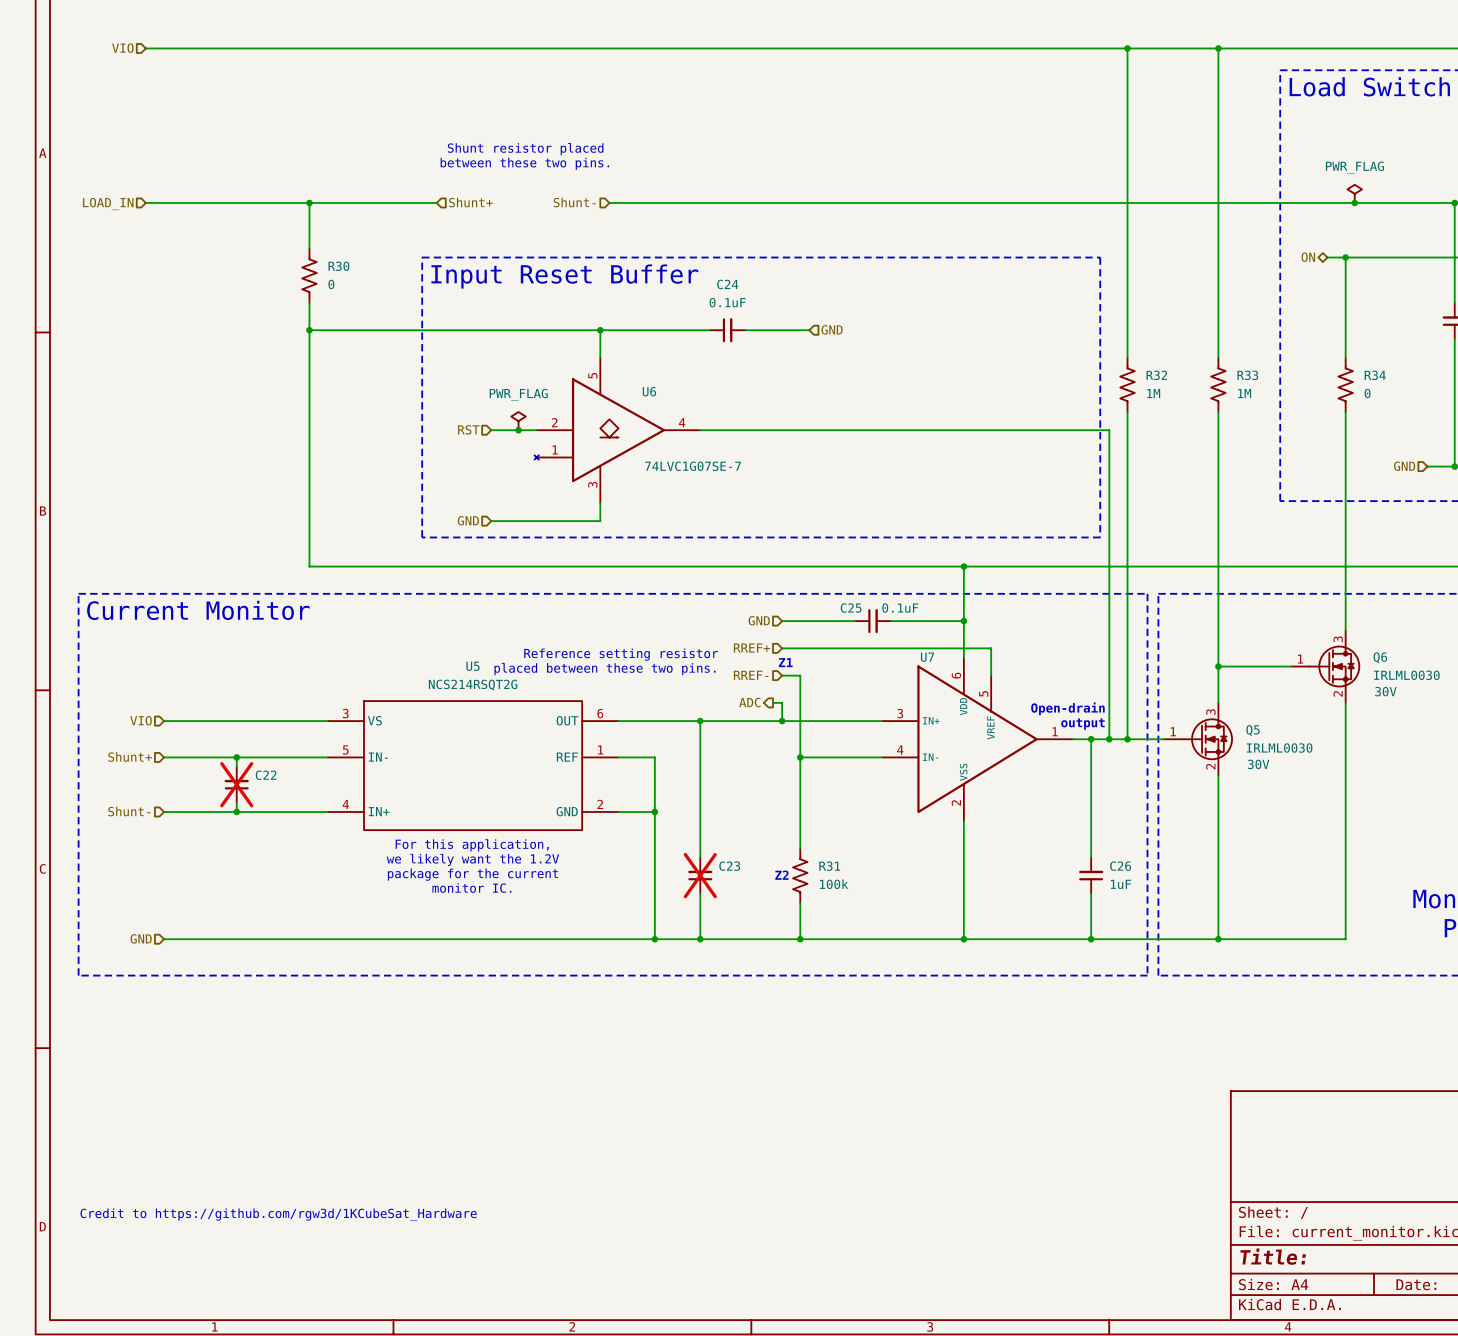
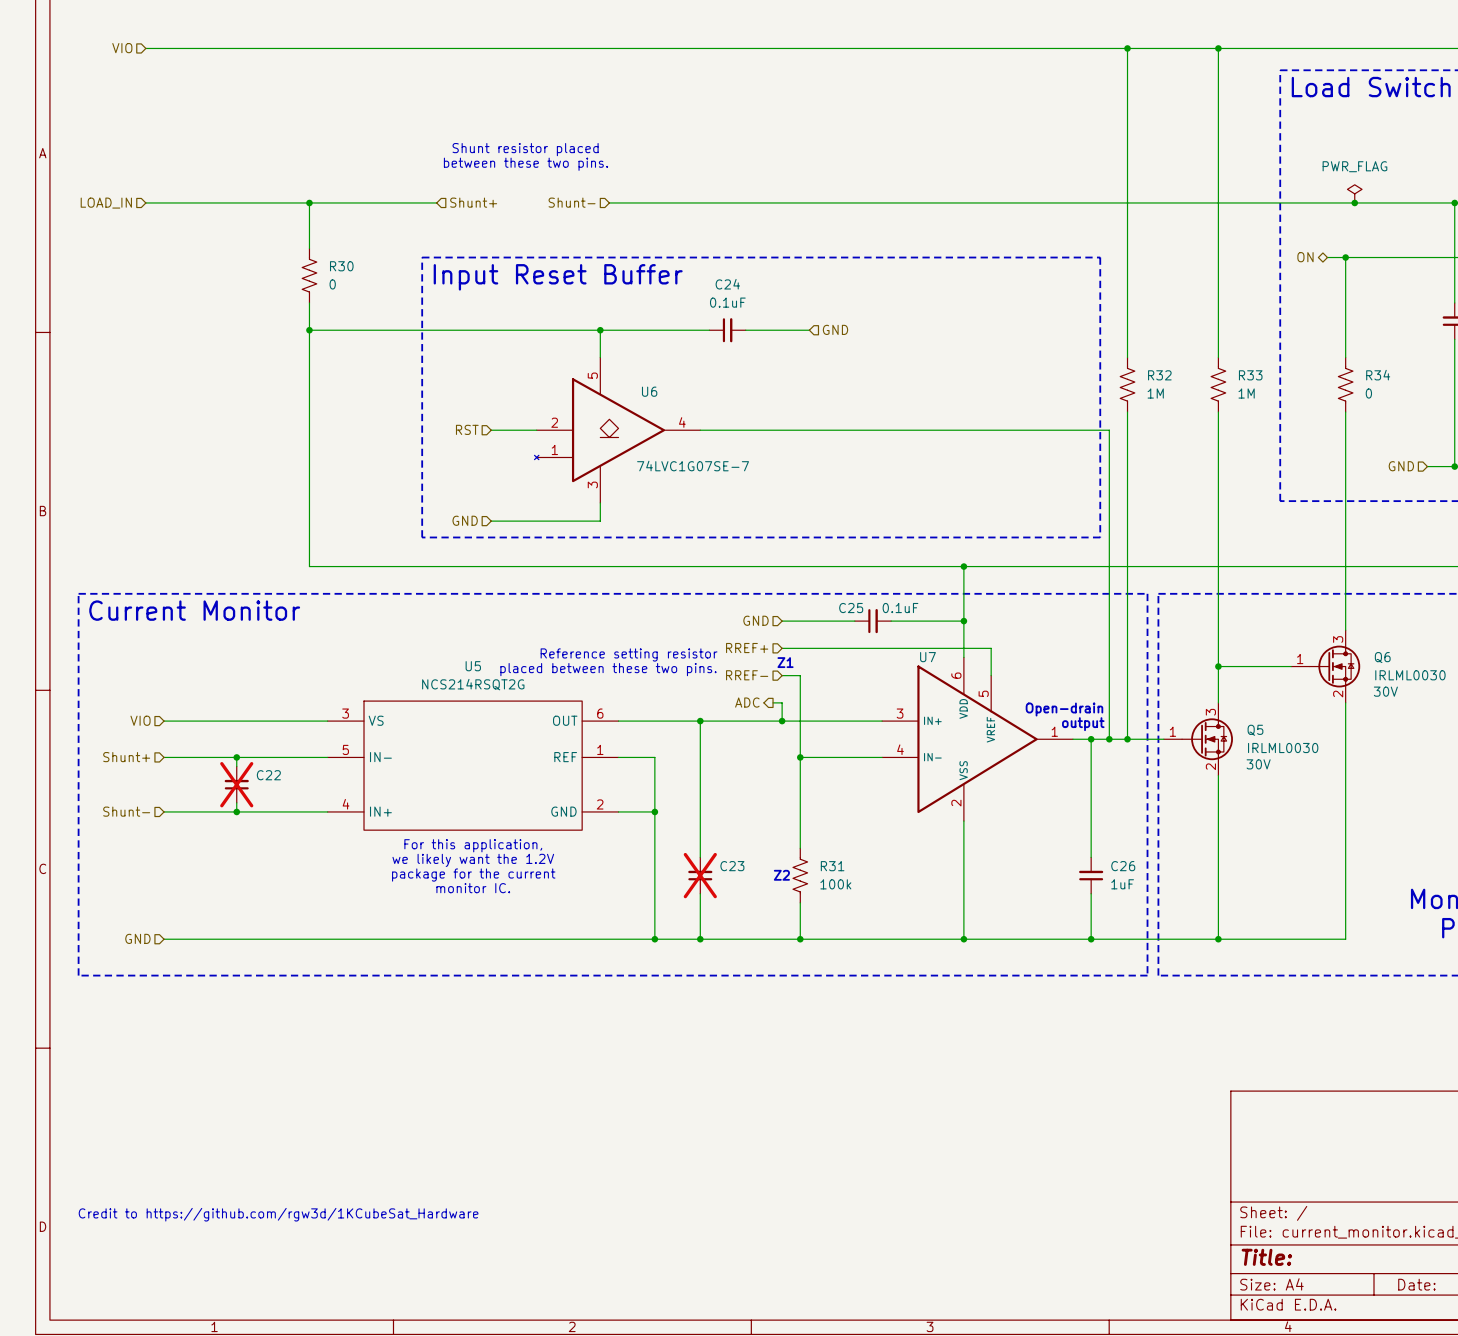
power symbol: PWR_FLAG (518, 421) -> none
junction: (518, 430) -> none

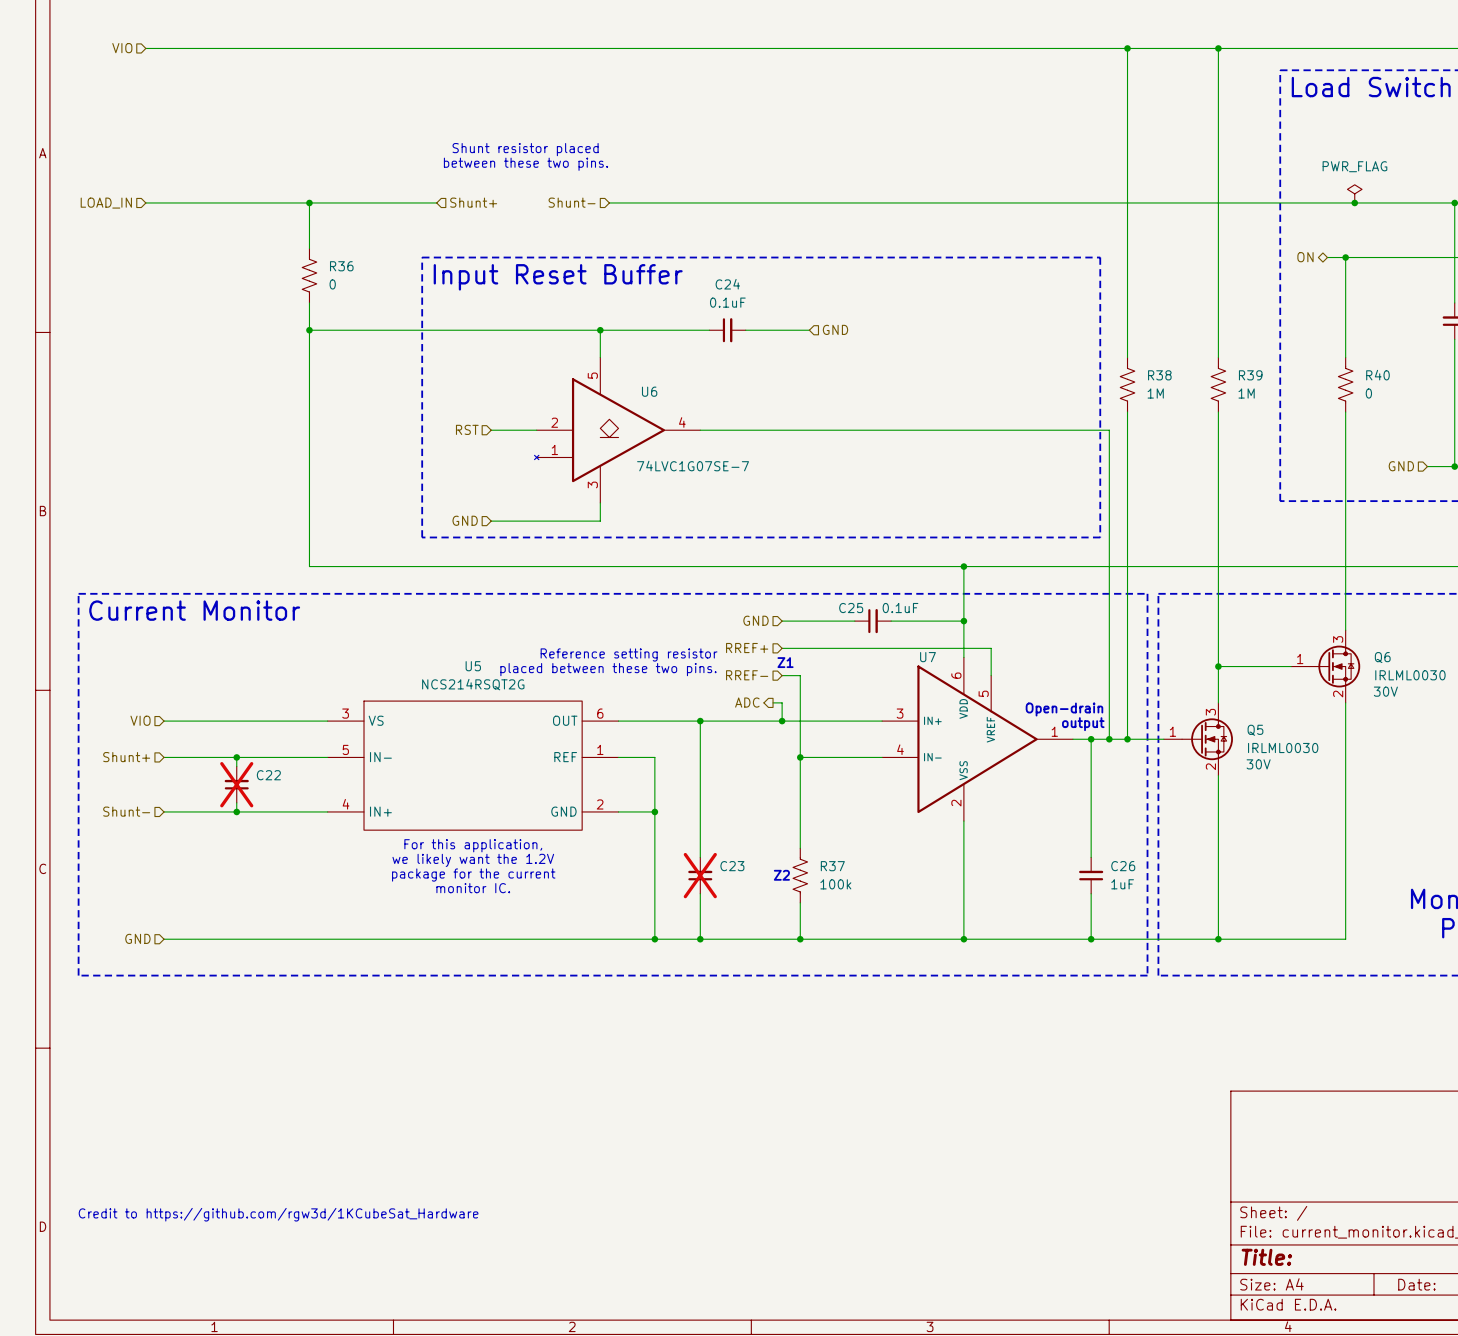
R30 name: R30 (341, 266) -> R36 (341, 266)
R32 name: R32 (1159, 375) -> R38 (1159, 375)
R33 name: R33 (1250, 375) -> R39 (1250, 375)
R34 name: R34 (1378, 375) -> R40 (1377, 375)
R31 name: R31 (832, 866) -> R37 (832, 866)

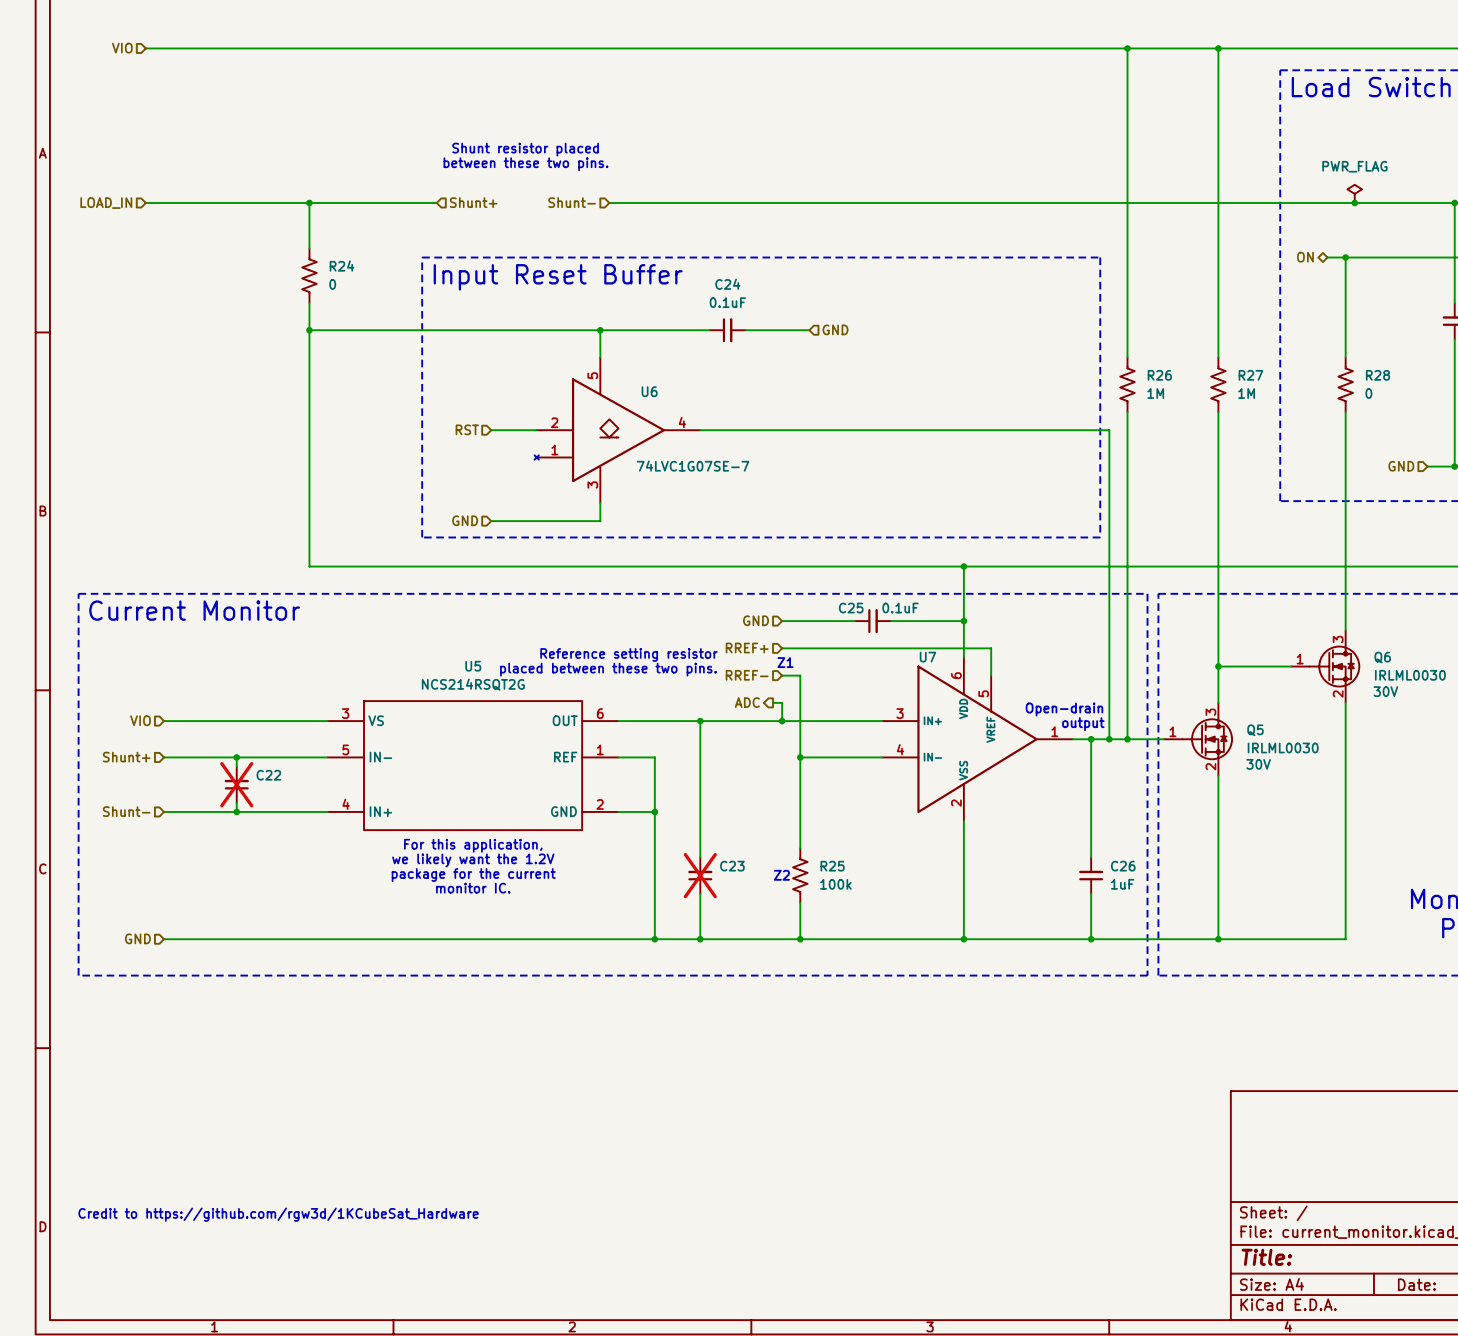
R36 name: R36 (341, 266) -> R24 (341, 266)
R38 name: R38 (1159, 375) -> R26 (1159, 375)
R39 name: R39 (1250, 375) -> R27 (1250, 375)
R40 name: R40 (1377, 375) -> R28 (1377, 375)
R37 name: R37 (832, 866) -> R25 (832, 866)

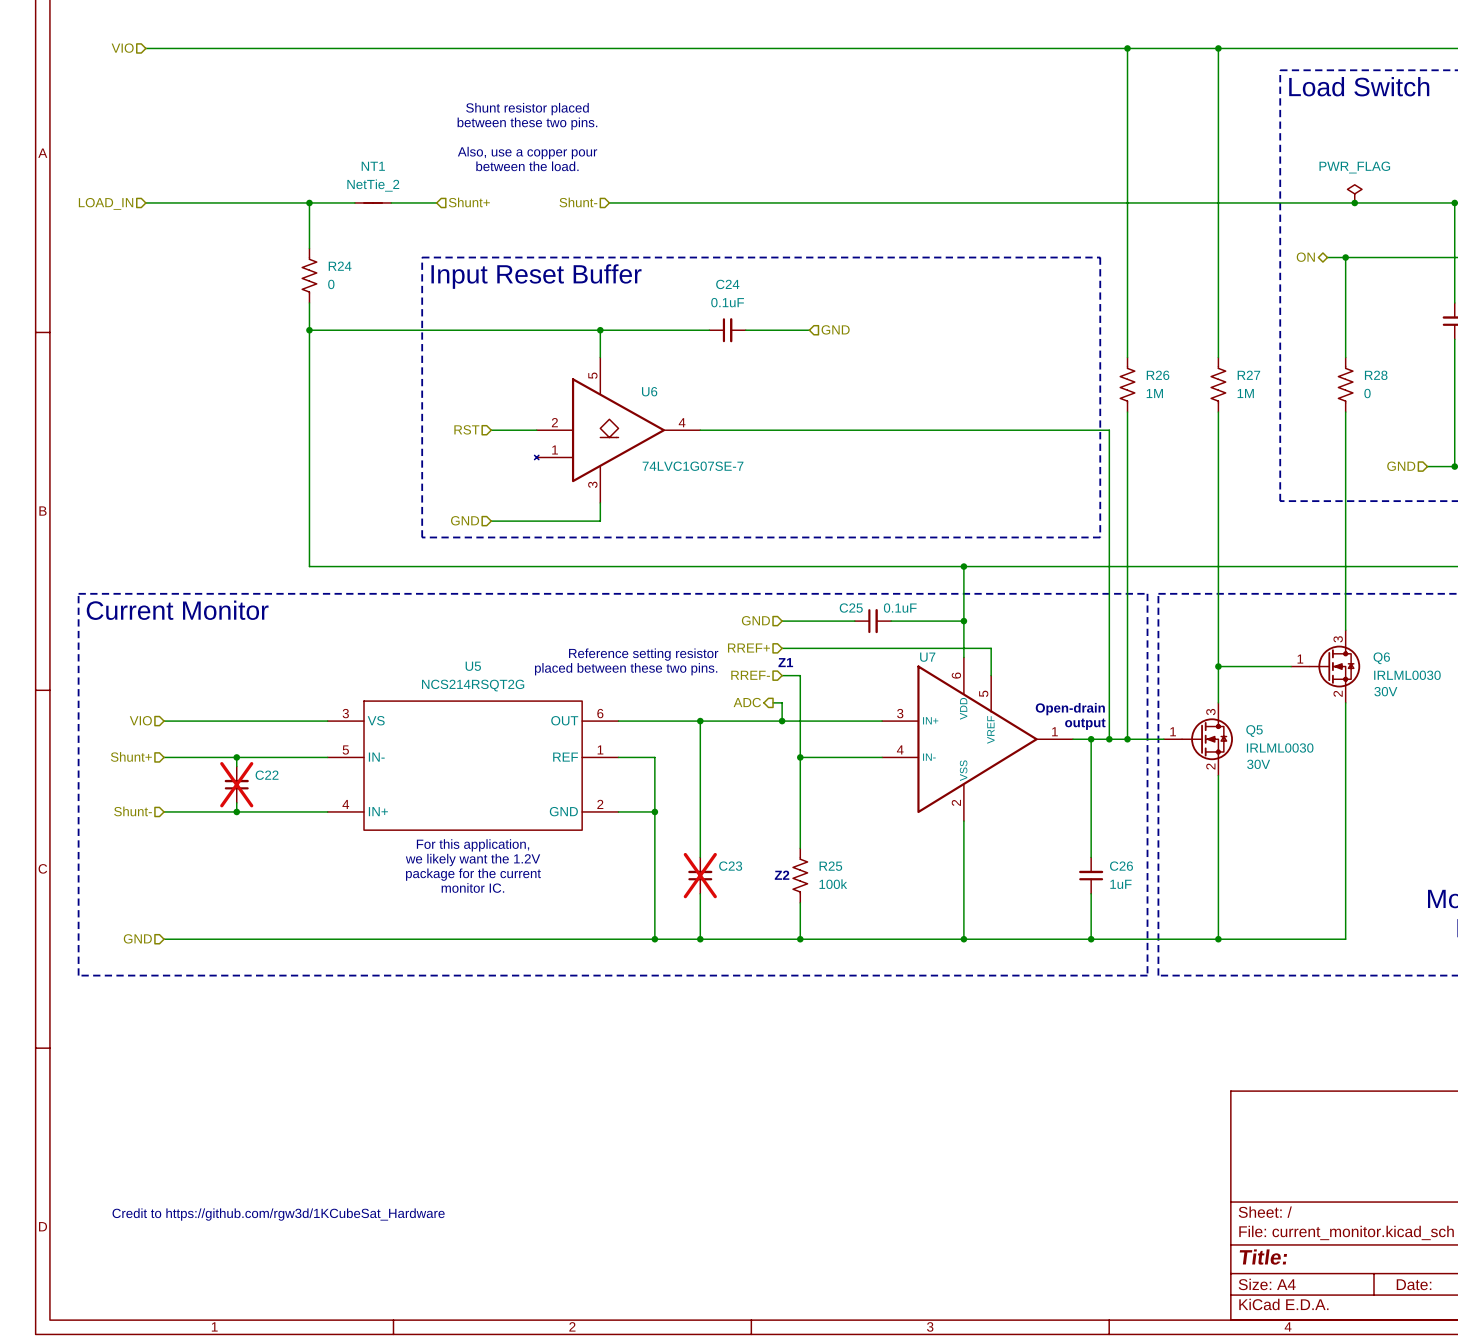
text: none -> Shunt resistor placed (527, 109)
text: none -> between these two pins. (527, 123)
text: Shunt resistor placed (525, 149) -> Also, use a copper pour (527, 152)
text: between these two pins. (526, 164) -> between the load. (527, 166)
NT1: none -> NetTie_2 (373, 202)

